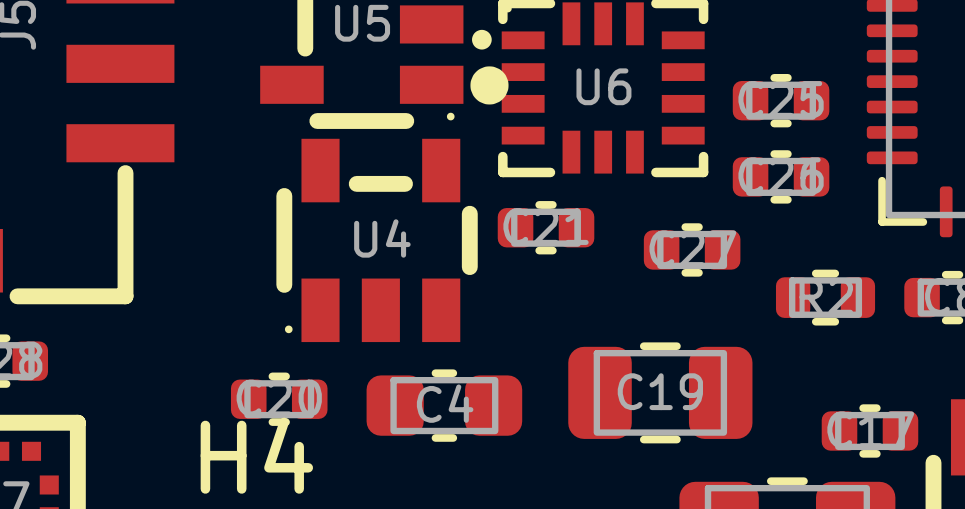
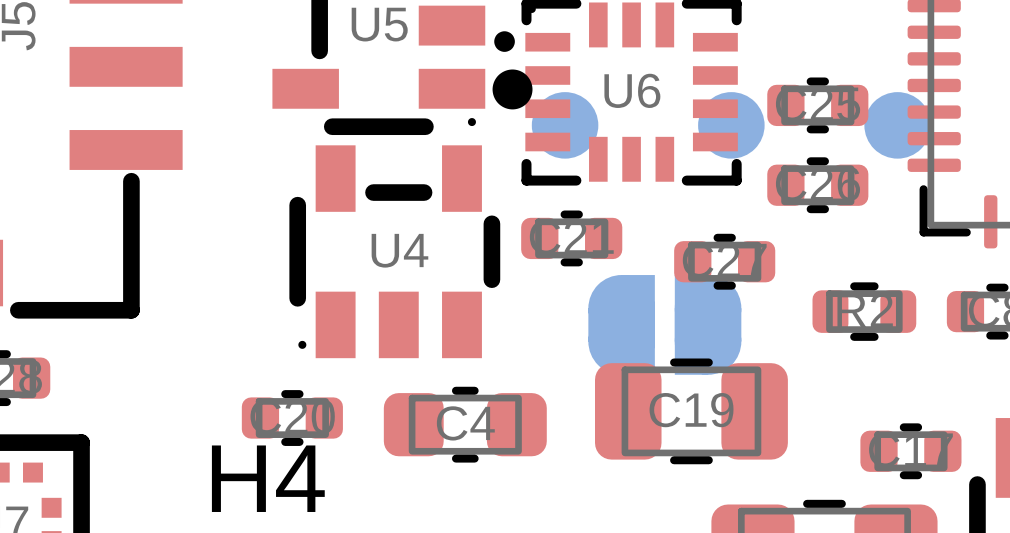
part: none -> (565, 125)
part: none -> (731, 125)
part: none -> (897, 125)
part: none -> (664, 324)

